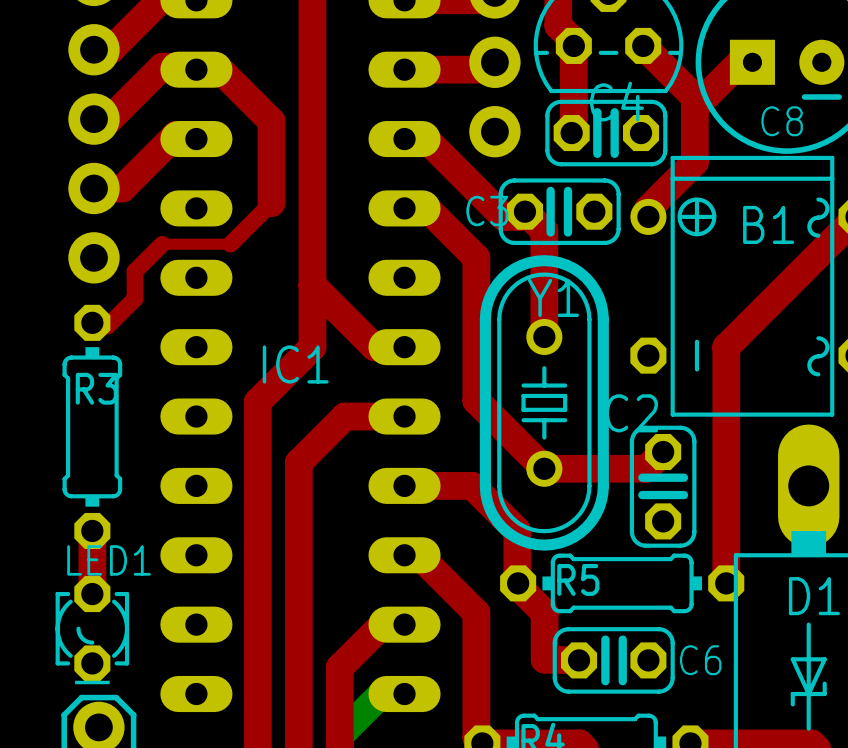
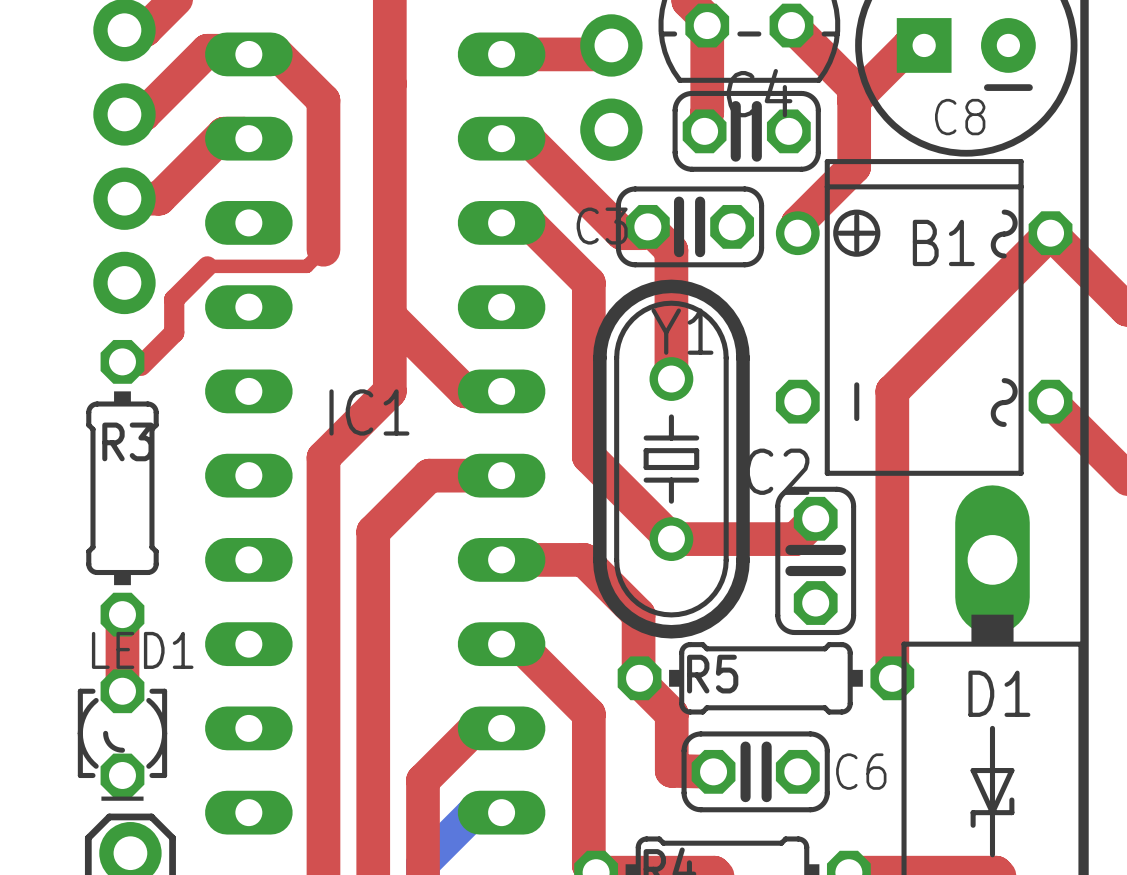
top track: (257, 107) (271, 121) (271, 203) (230, 244) -> (323, 100) (323, 249) (306, 266) (290, 266)

